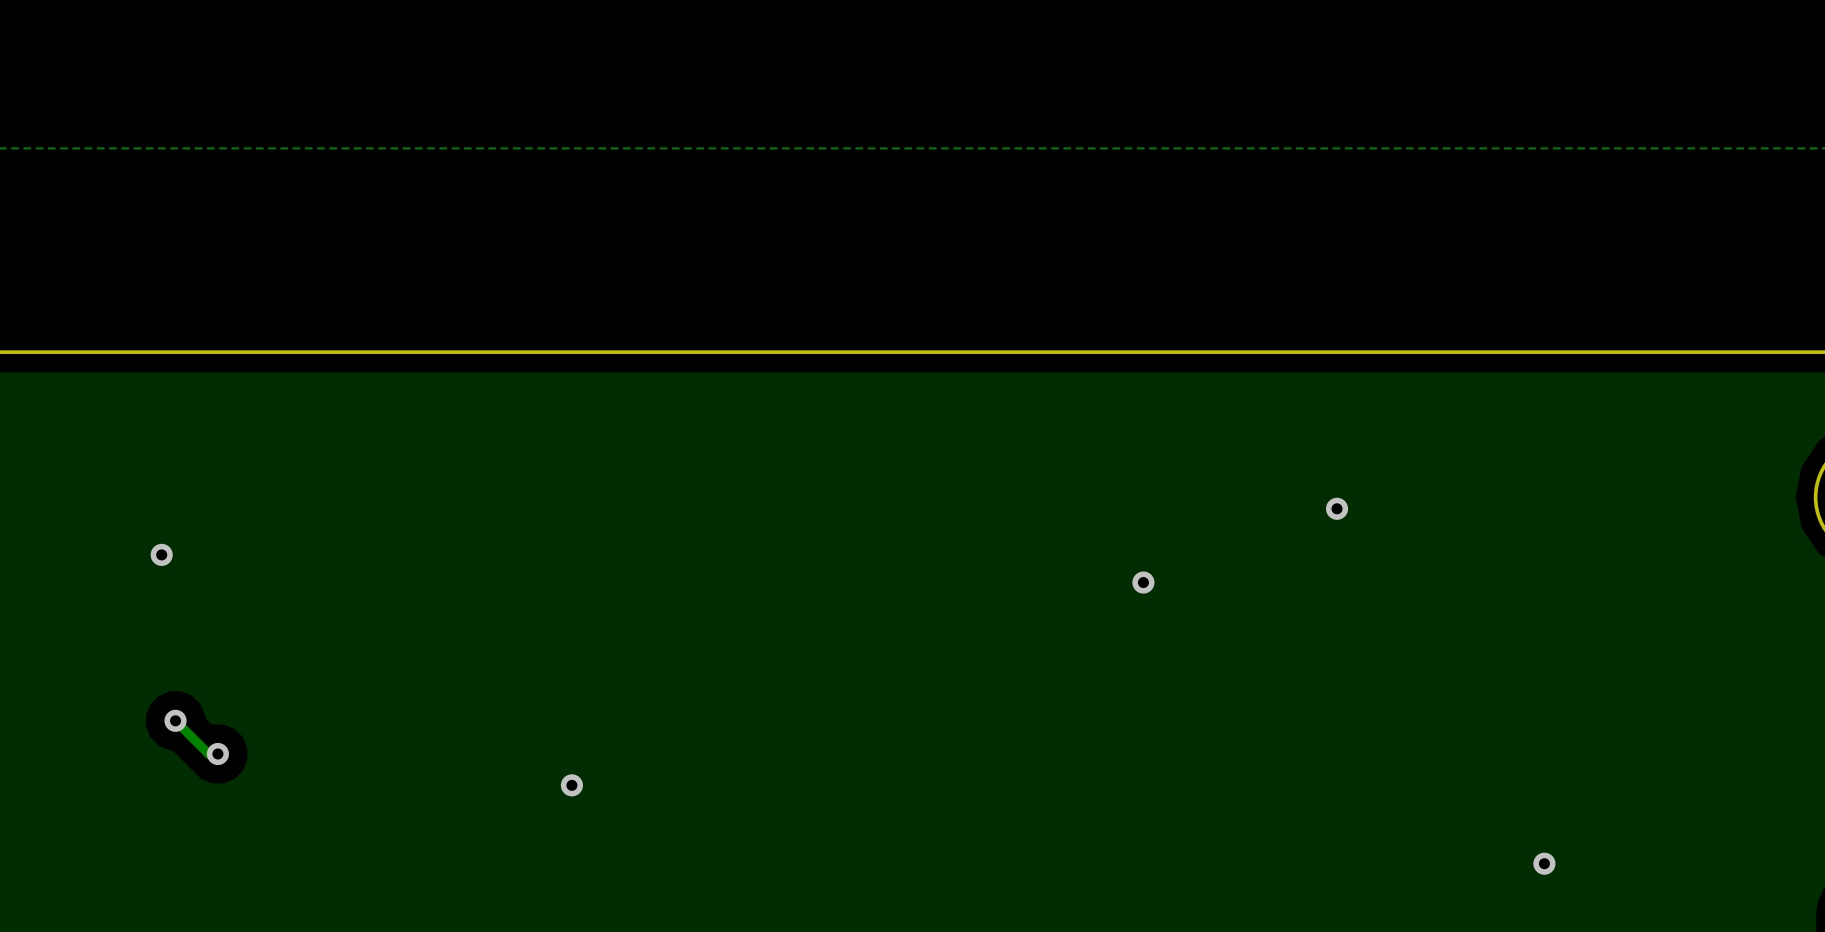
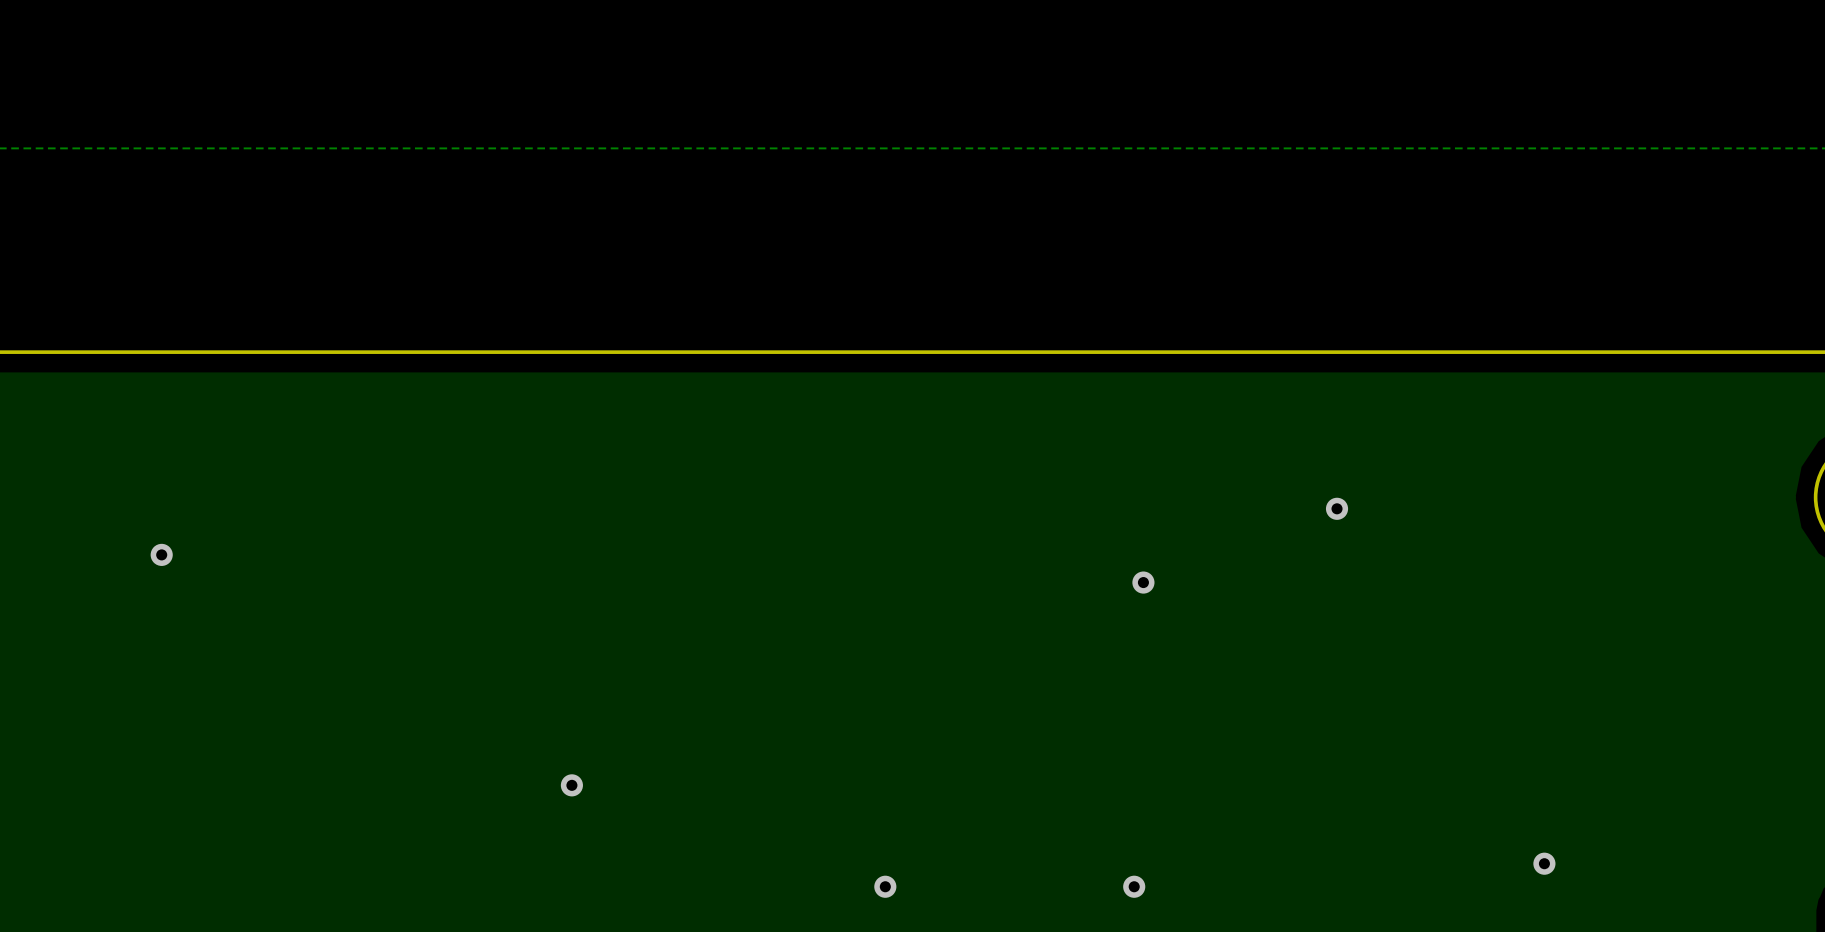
track: (175, 720) (208, 753) (217, 753) -> none
via: (175, 720) -> none
via: (217, 753) -> none
via: none -> (885, 886)
via: none -> (1134, 886)

